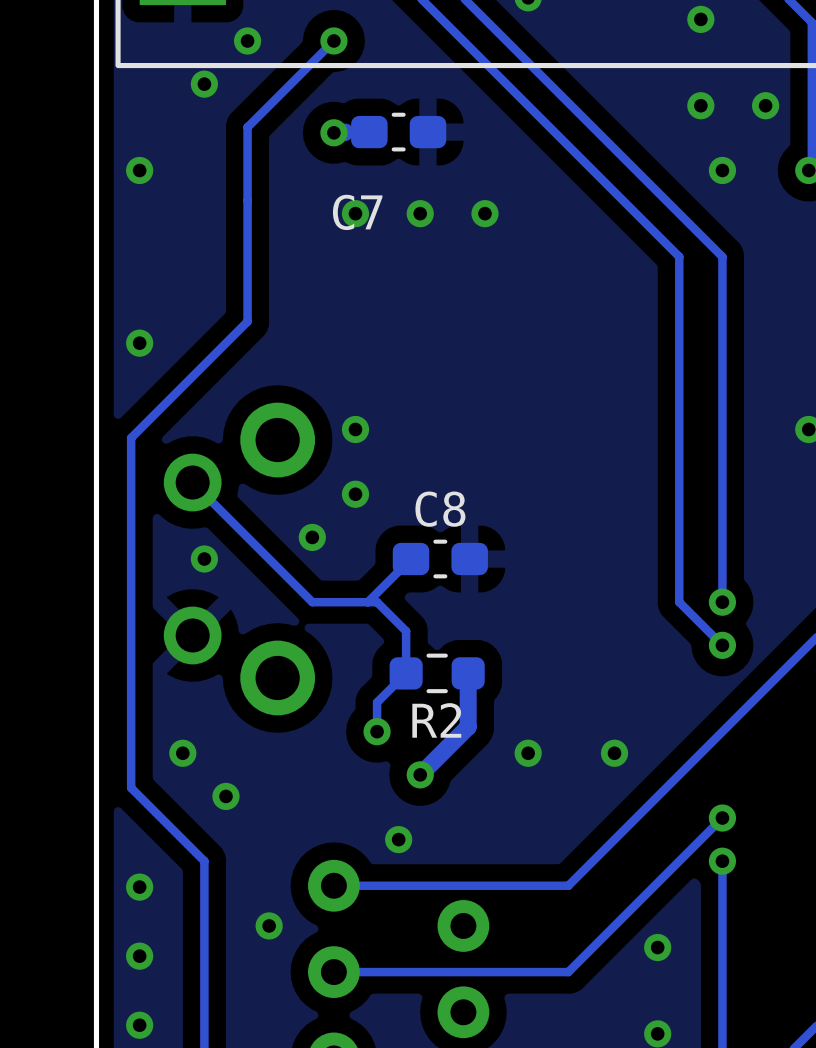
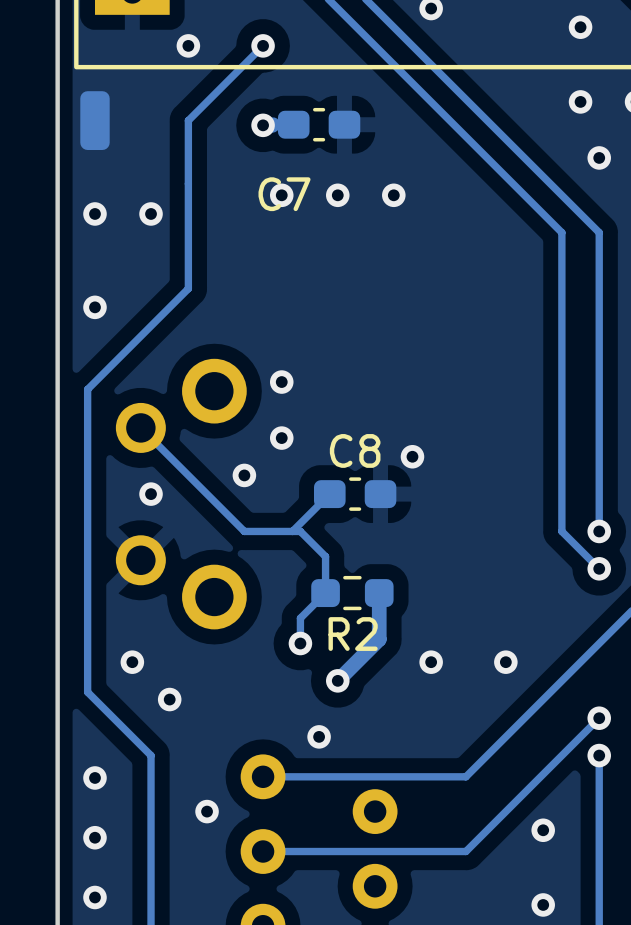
via: (204, 84) -> none
part: none -> (94, 120)
via: (139, 170) -> none
via: none -> (94, 213)
via: none -> (151, 213)
via: none -> (412, 456)

